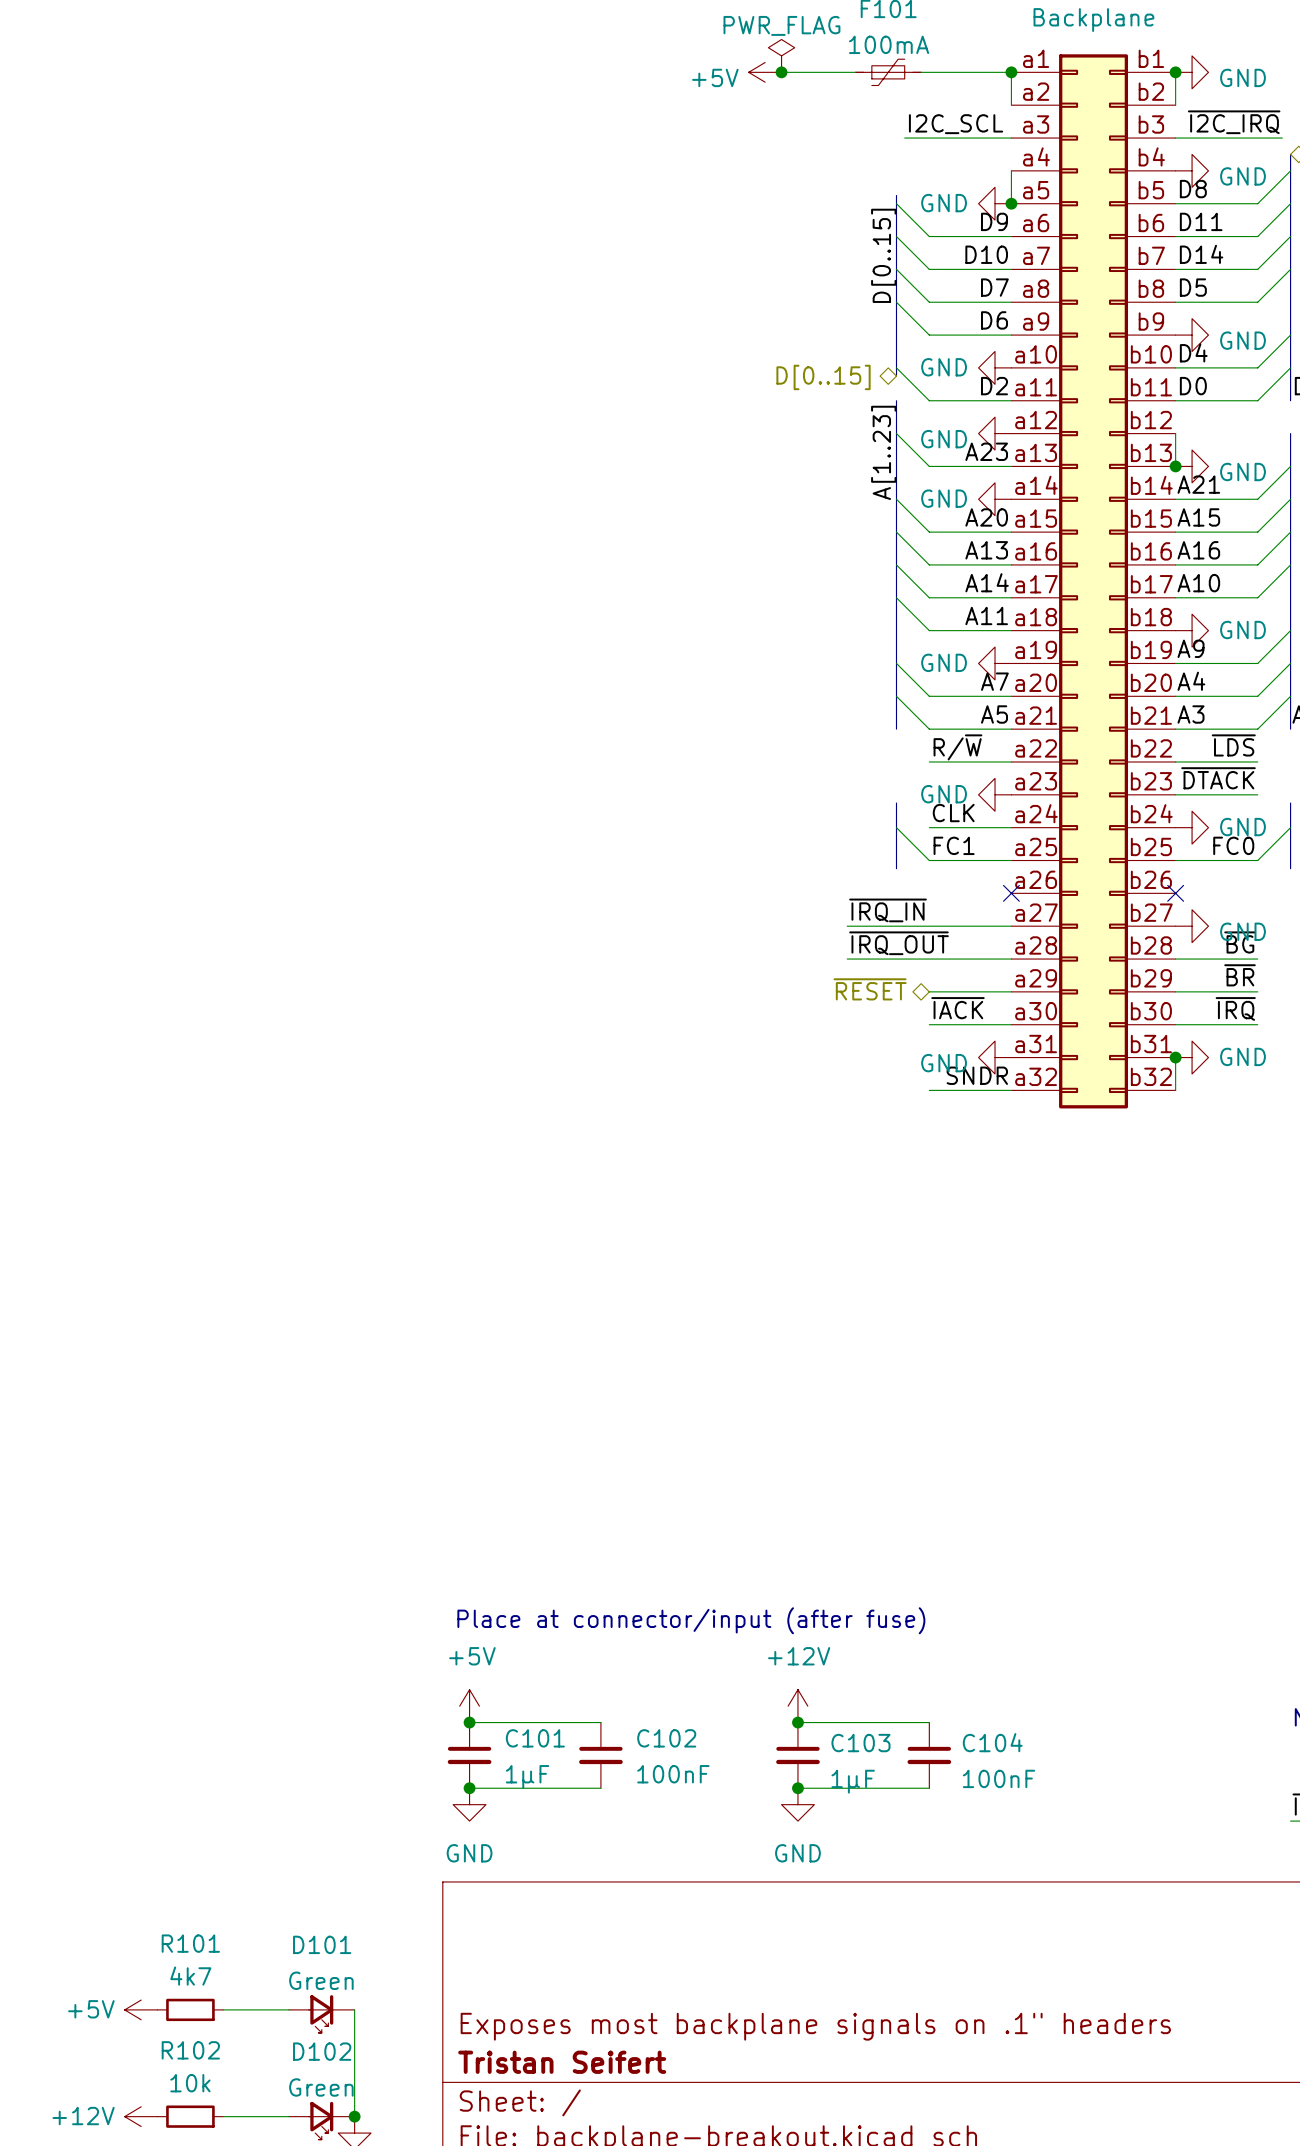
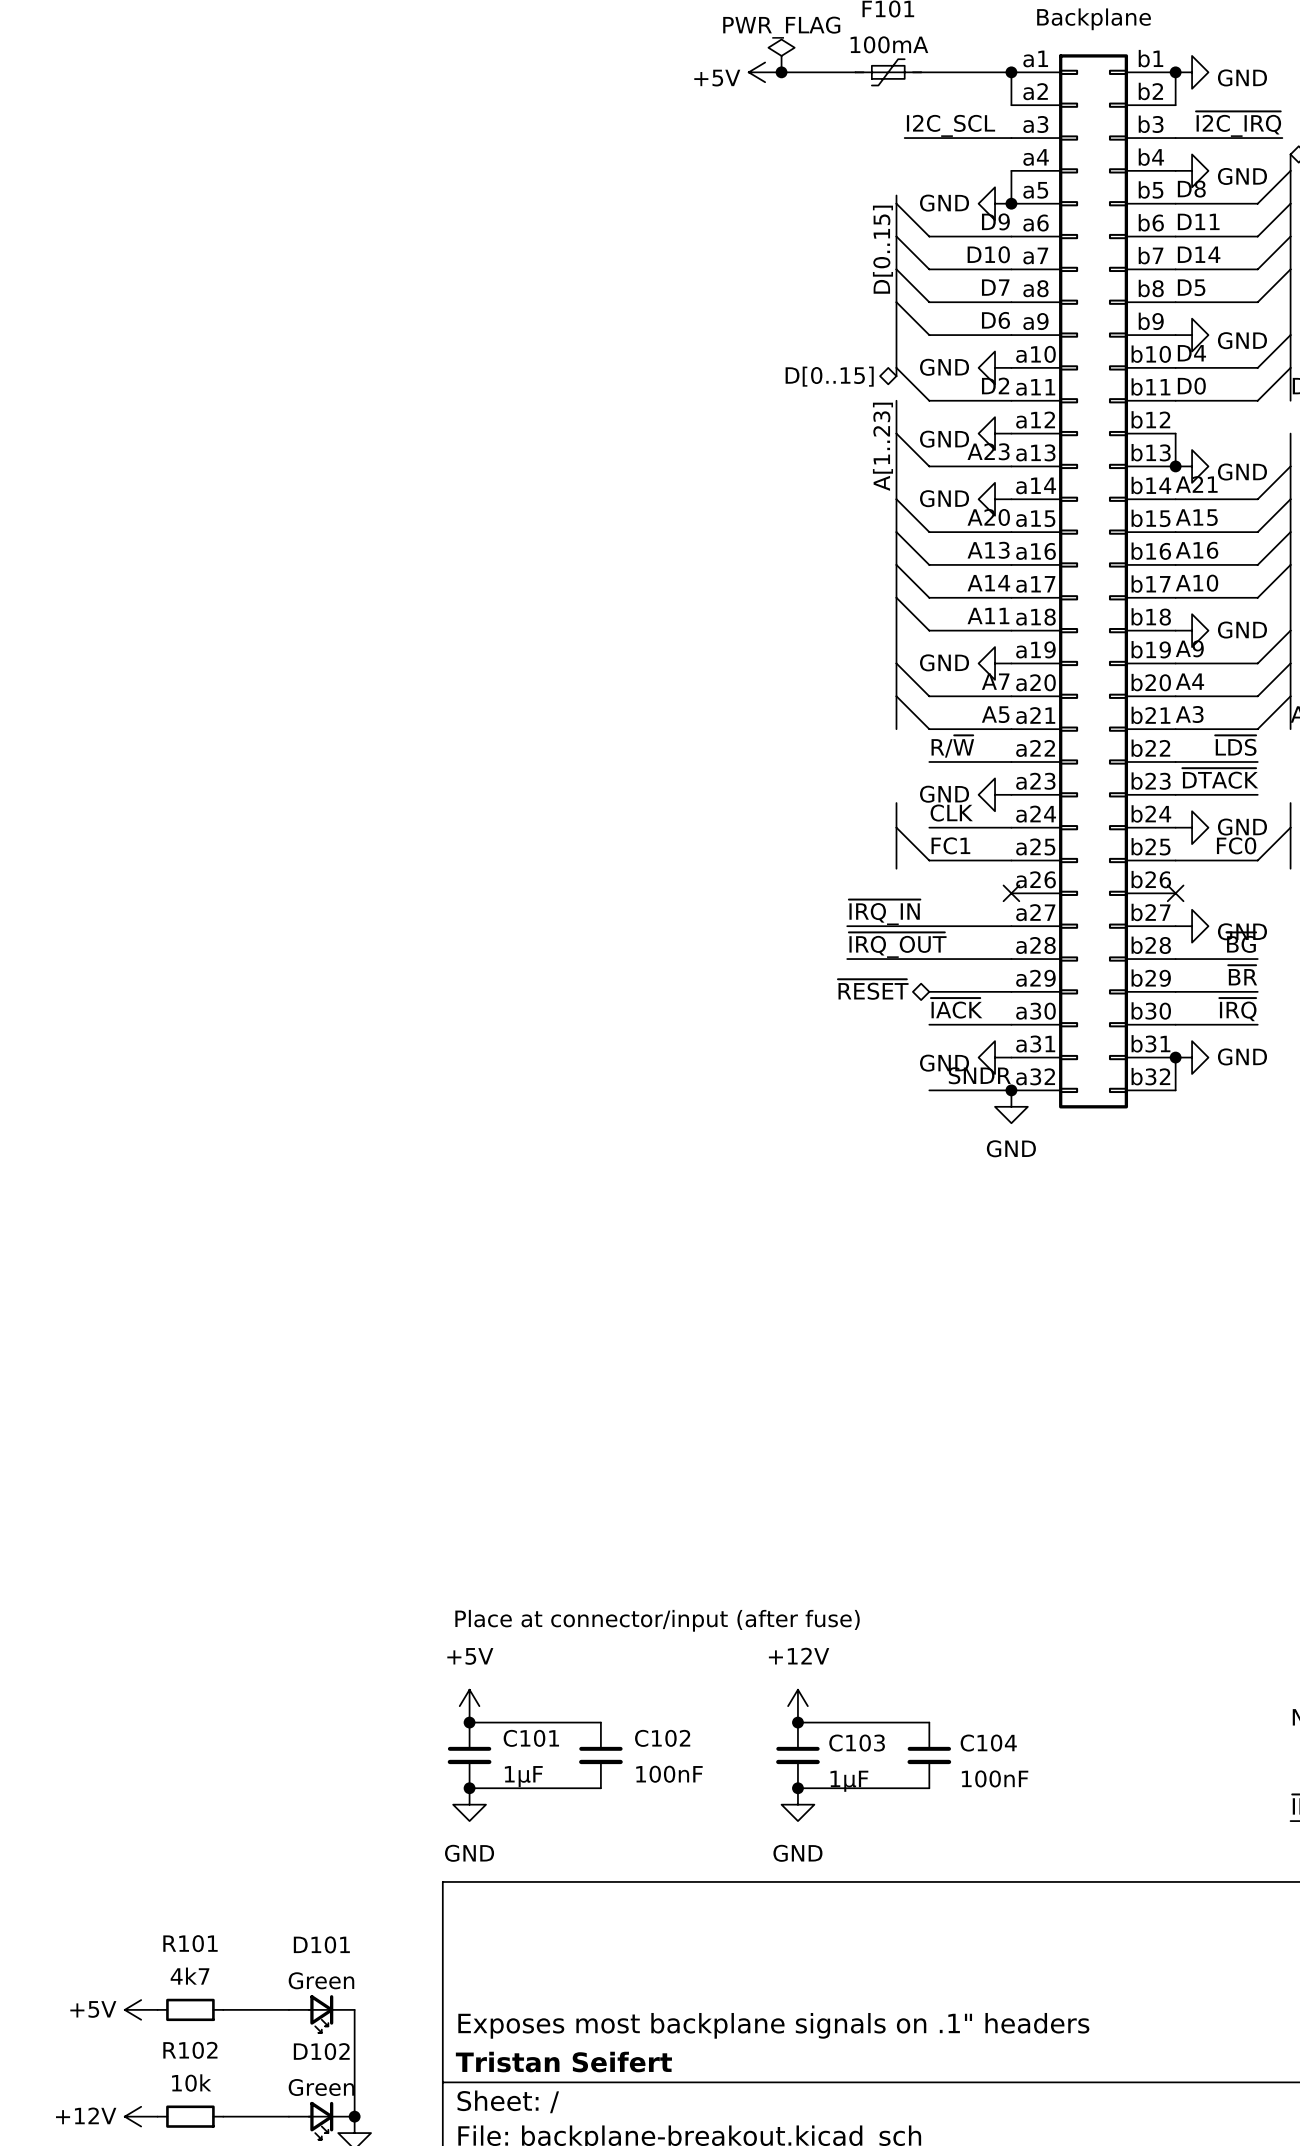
junction: none -> (1011, 1090)
power symbol: none -> GND (1011, 1106)

